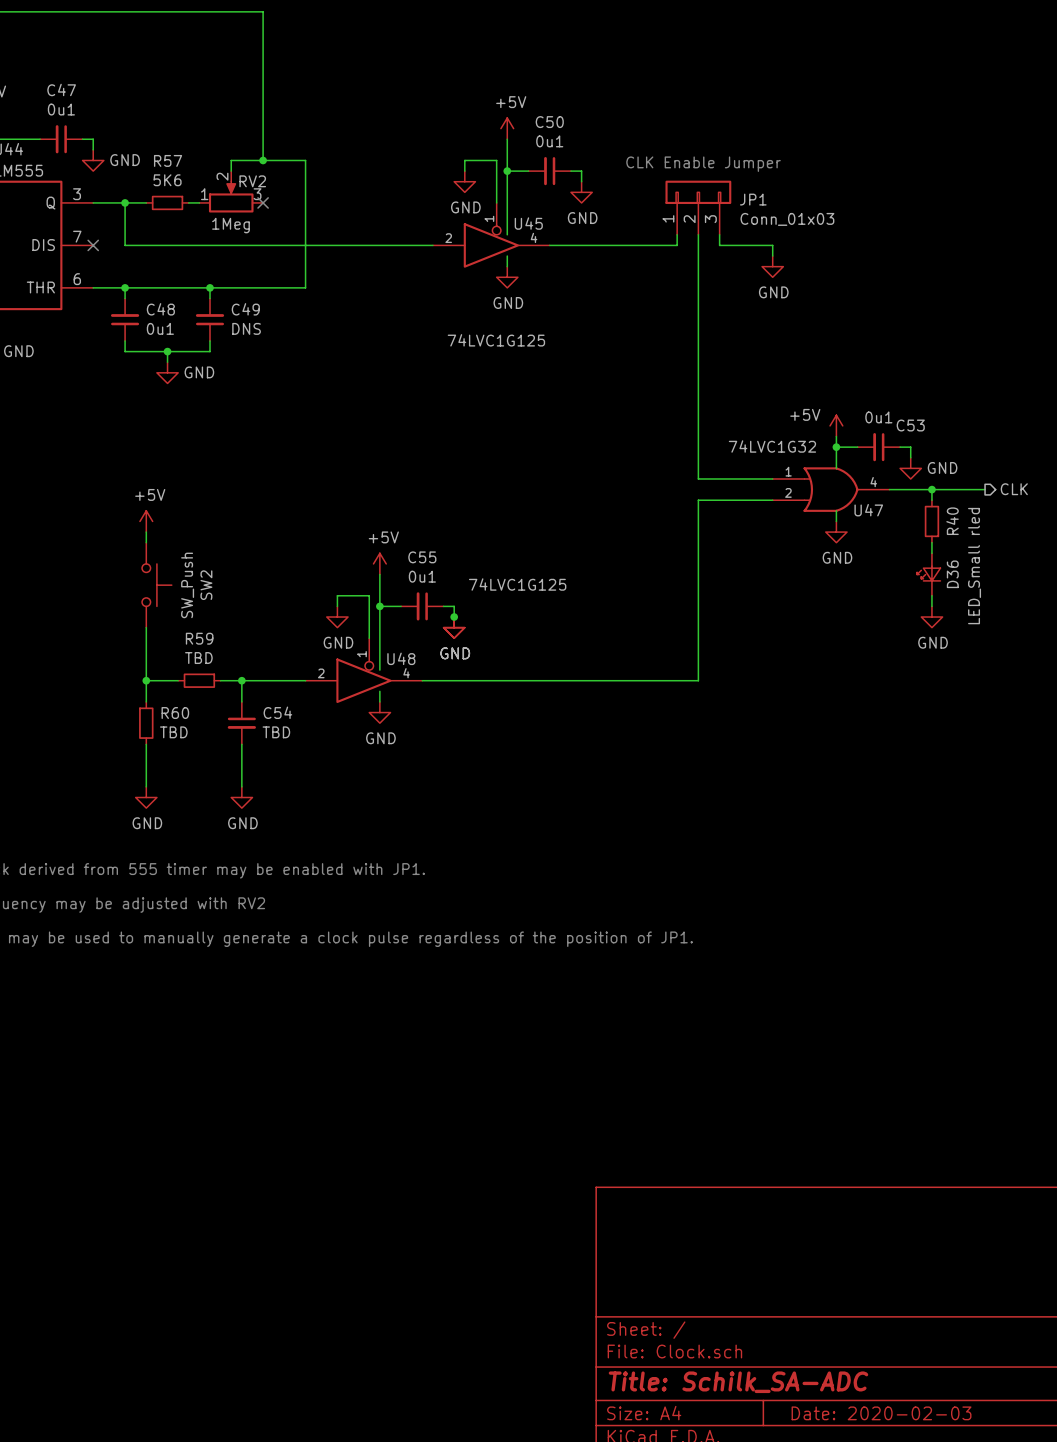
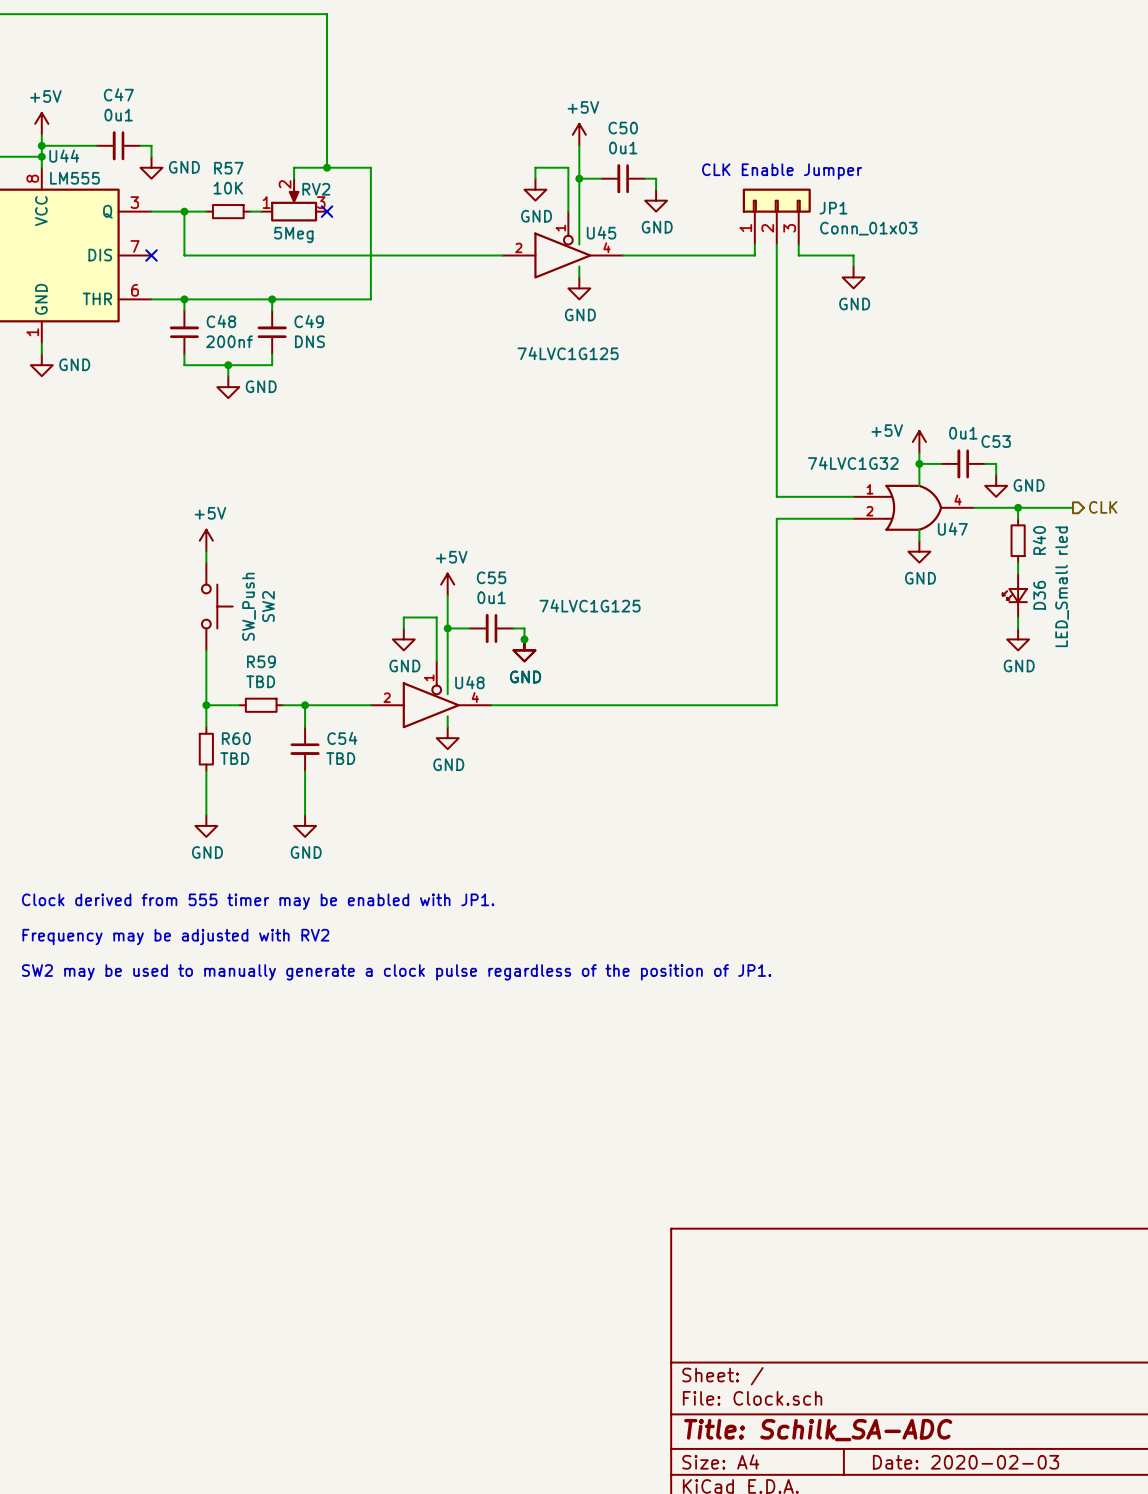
R57 value: 5K6 (167, 180) -> 10K (228, 188)
RV2 value: 1Meg (230, 225) -> 5Meg (293, 234)
C48 value: 0u1 (160, 328) -> 200nf (229, 341)

